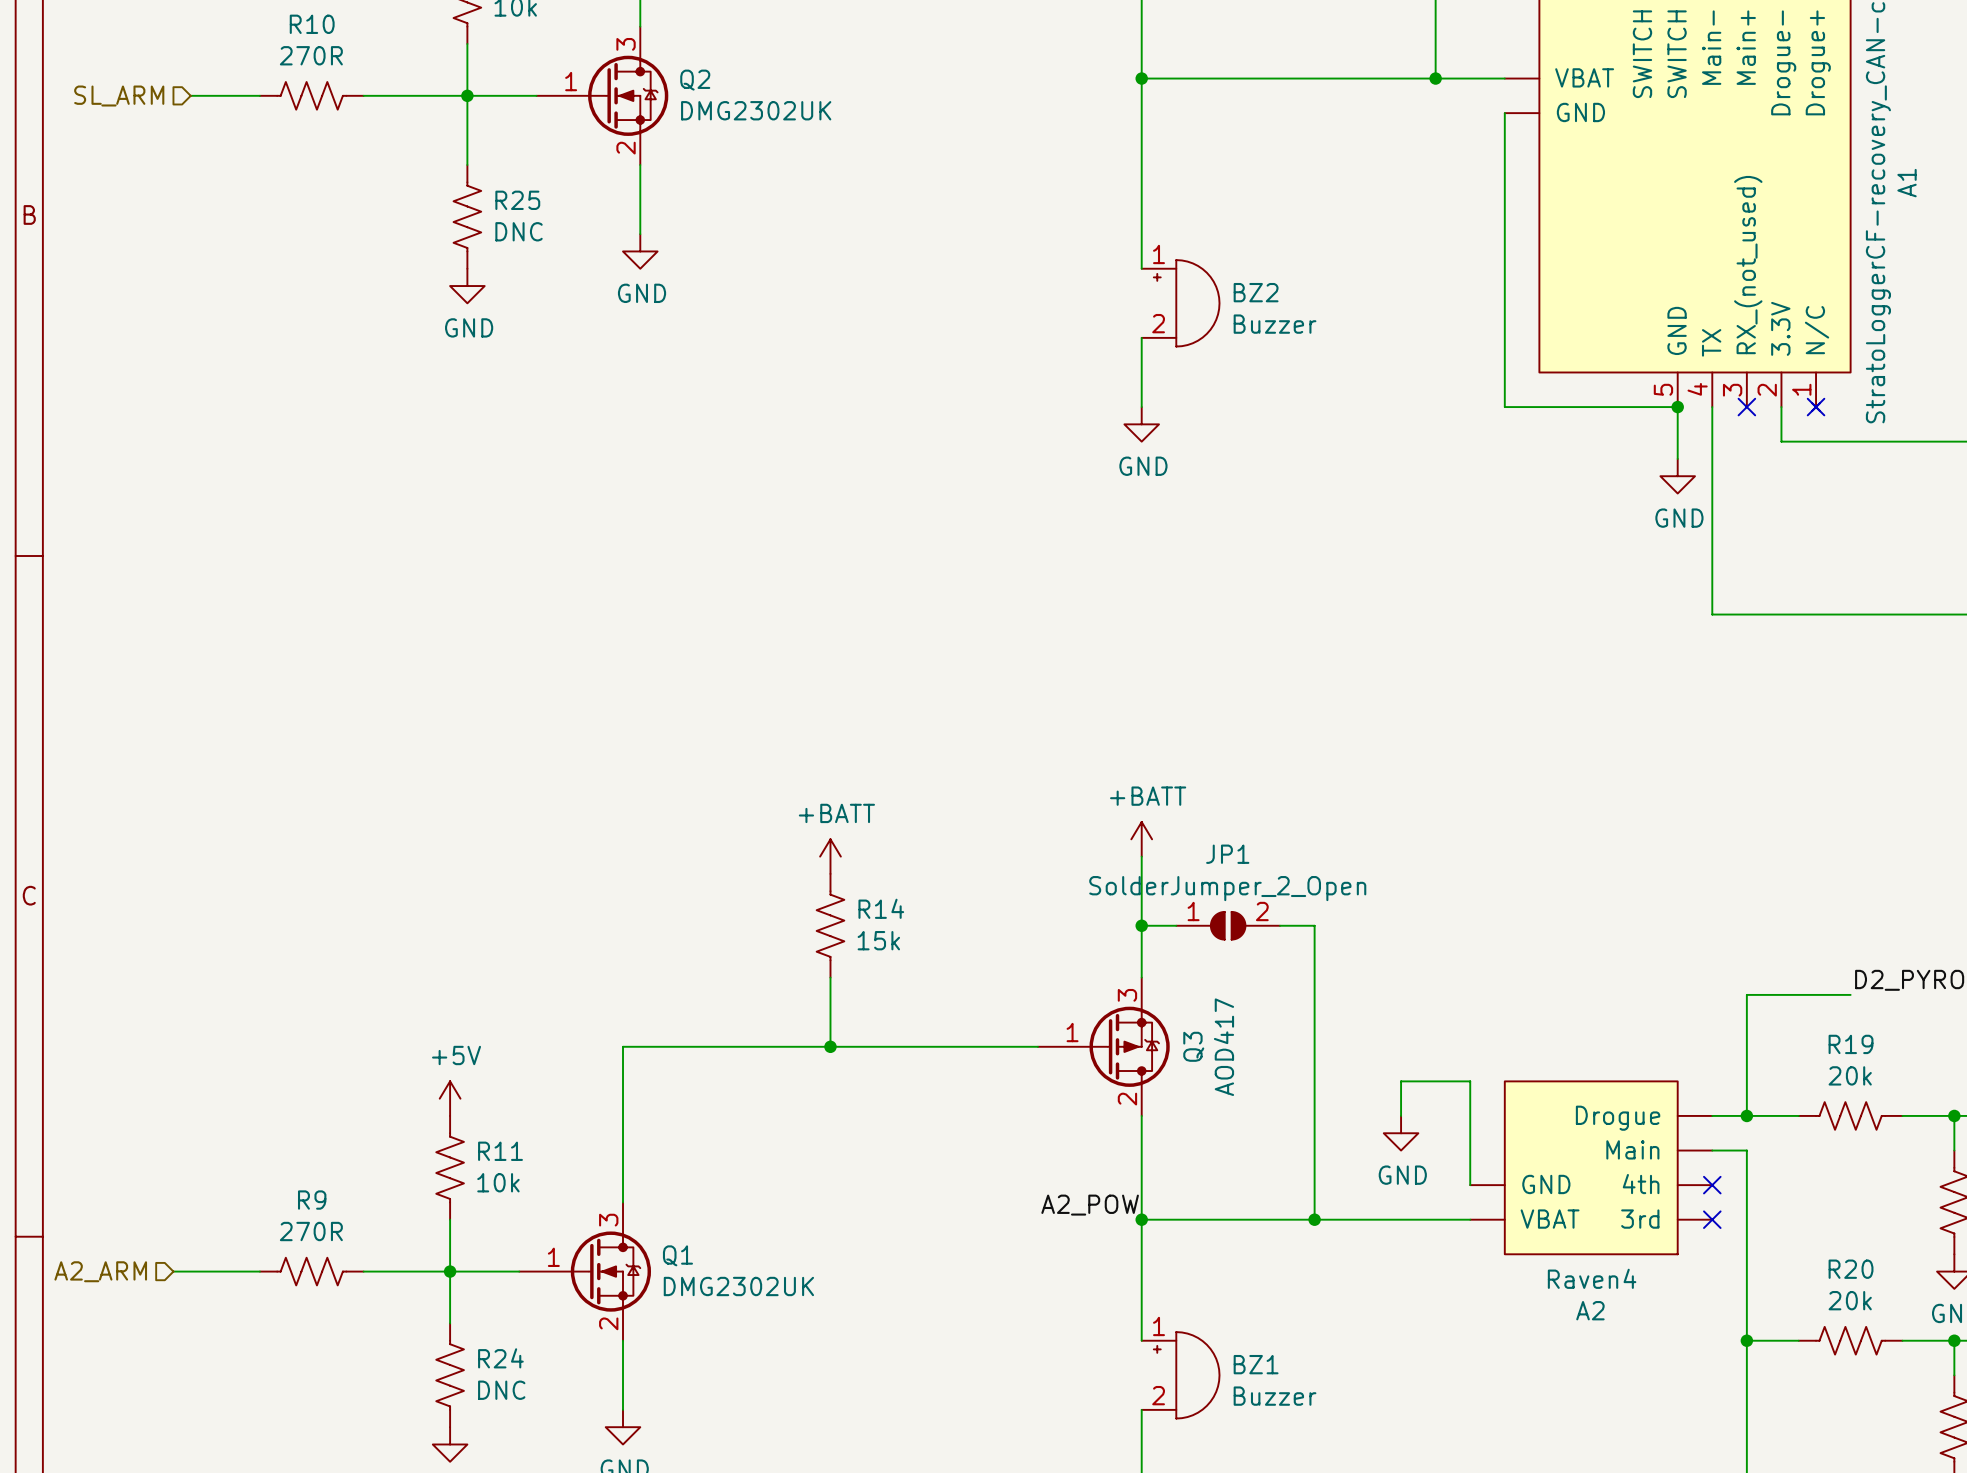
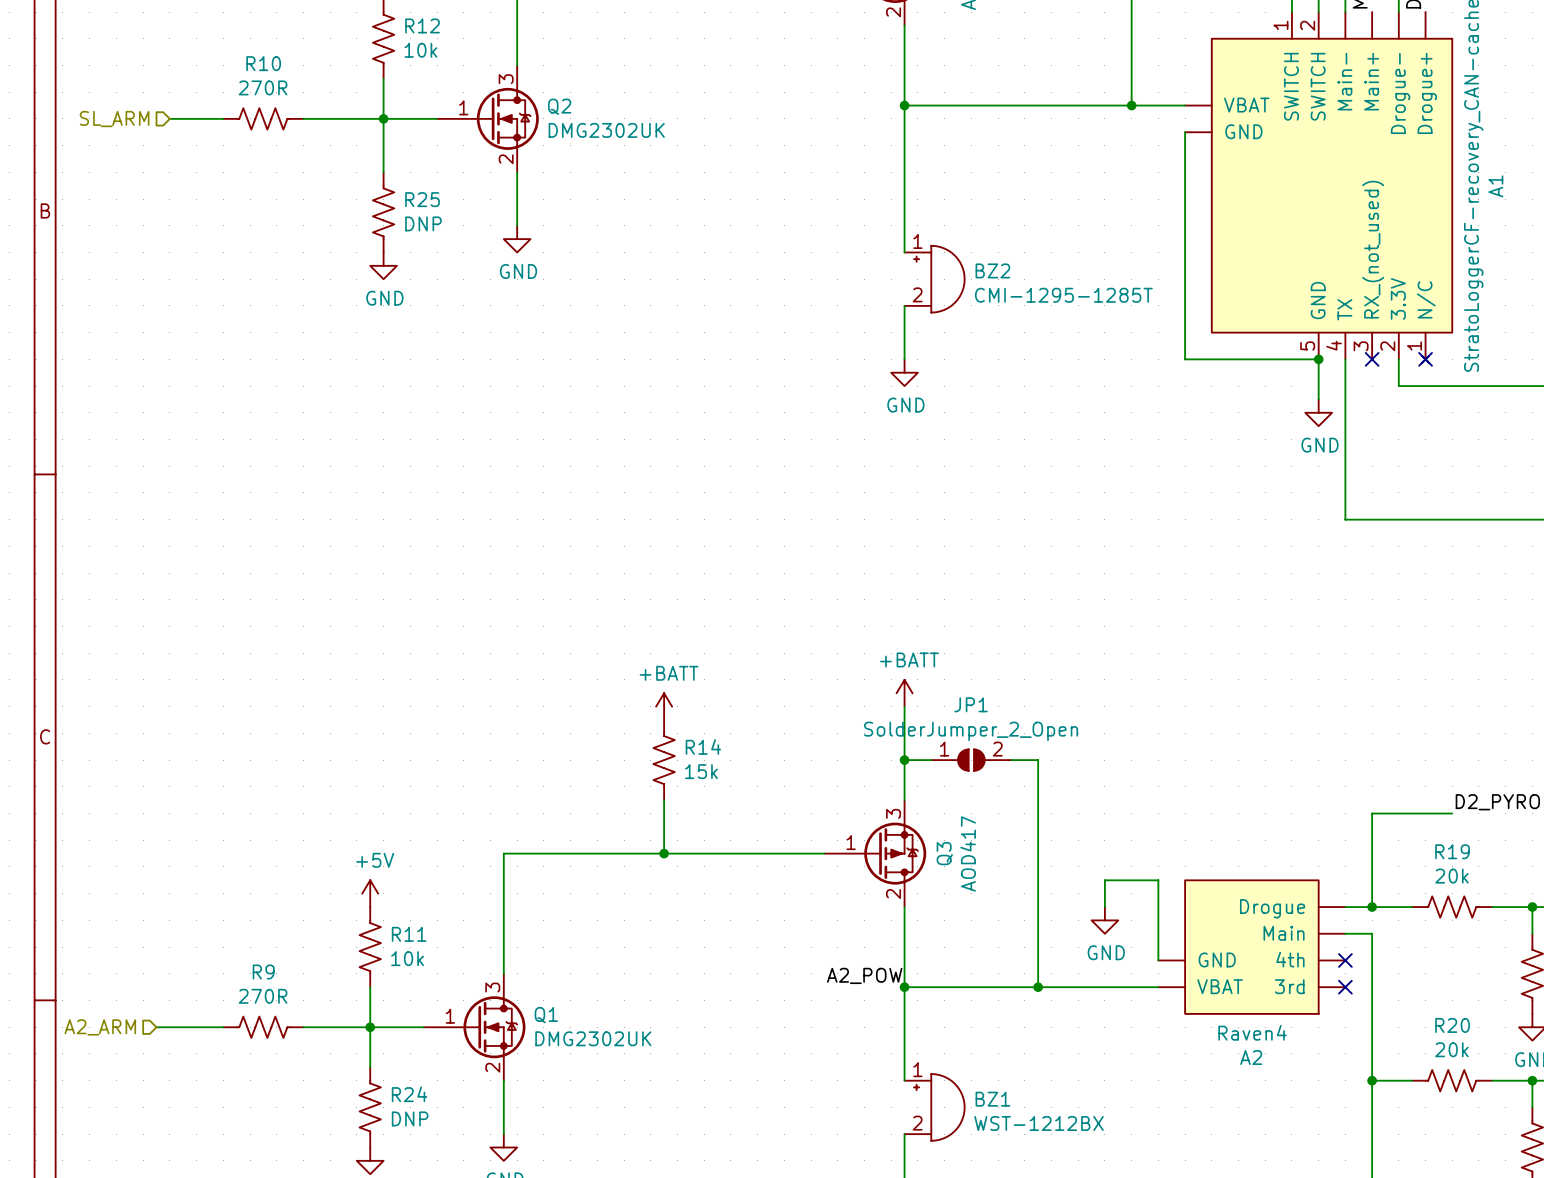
R25 value: DNC (519, 231) -> DNP (423, 223)
BZ2 value: Buzzer (1275, 324) -> CMI-1295-1285T (1063, 295)
R24 value: DNC (501, 1390) -> DNP (410, 1118)
BZ1 value: Buzzer (1275, 1396) -> WST-1212BX (1039, 1123)

